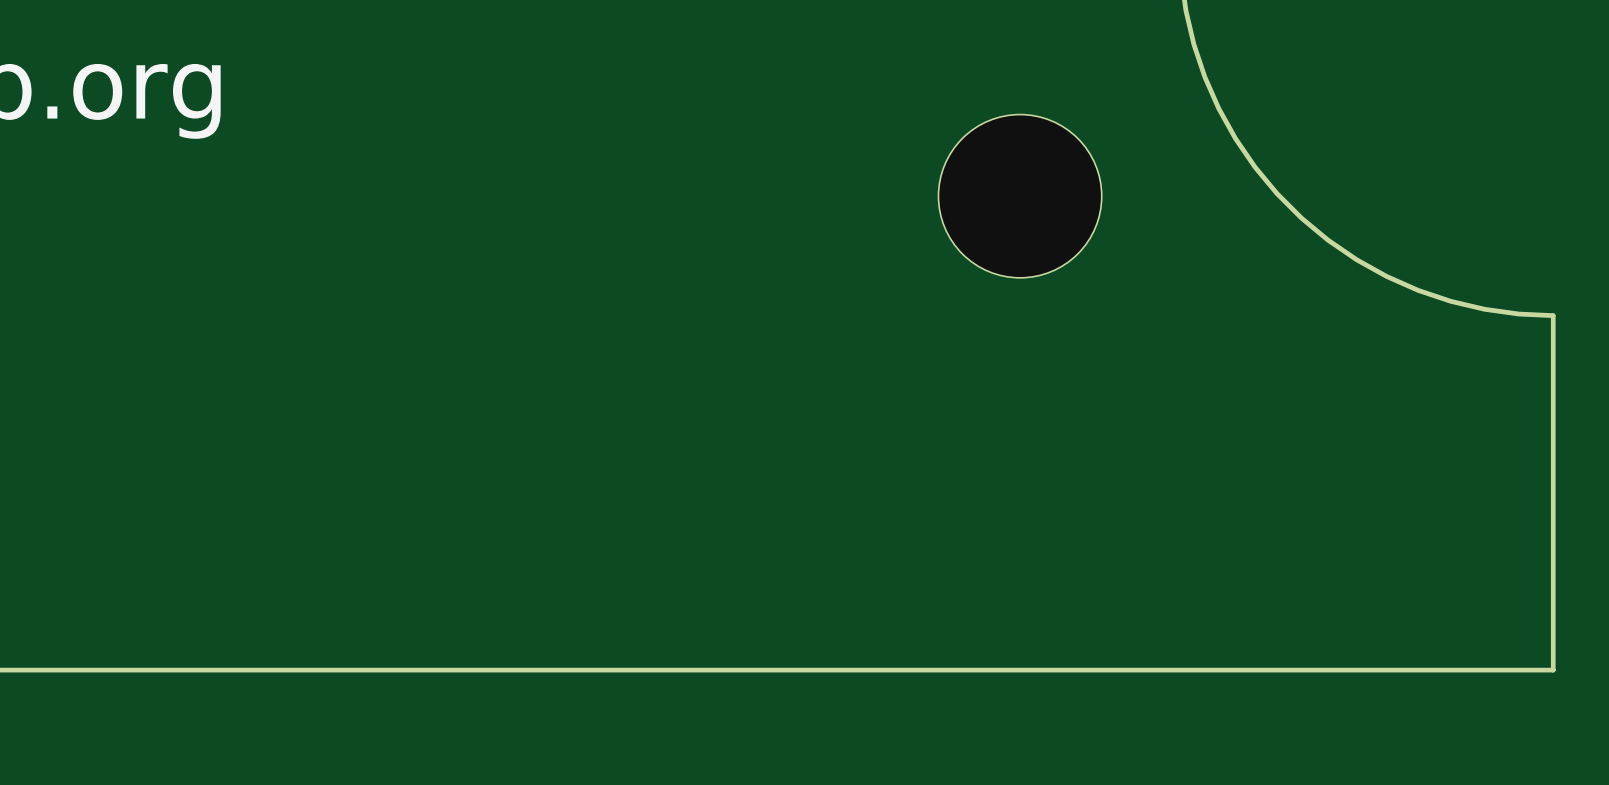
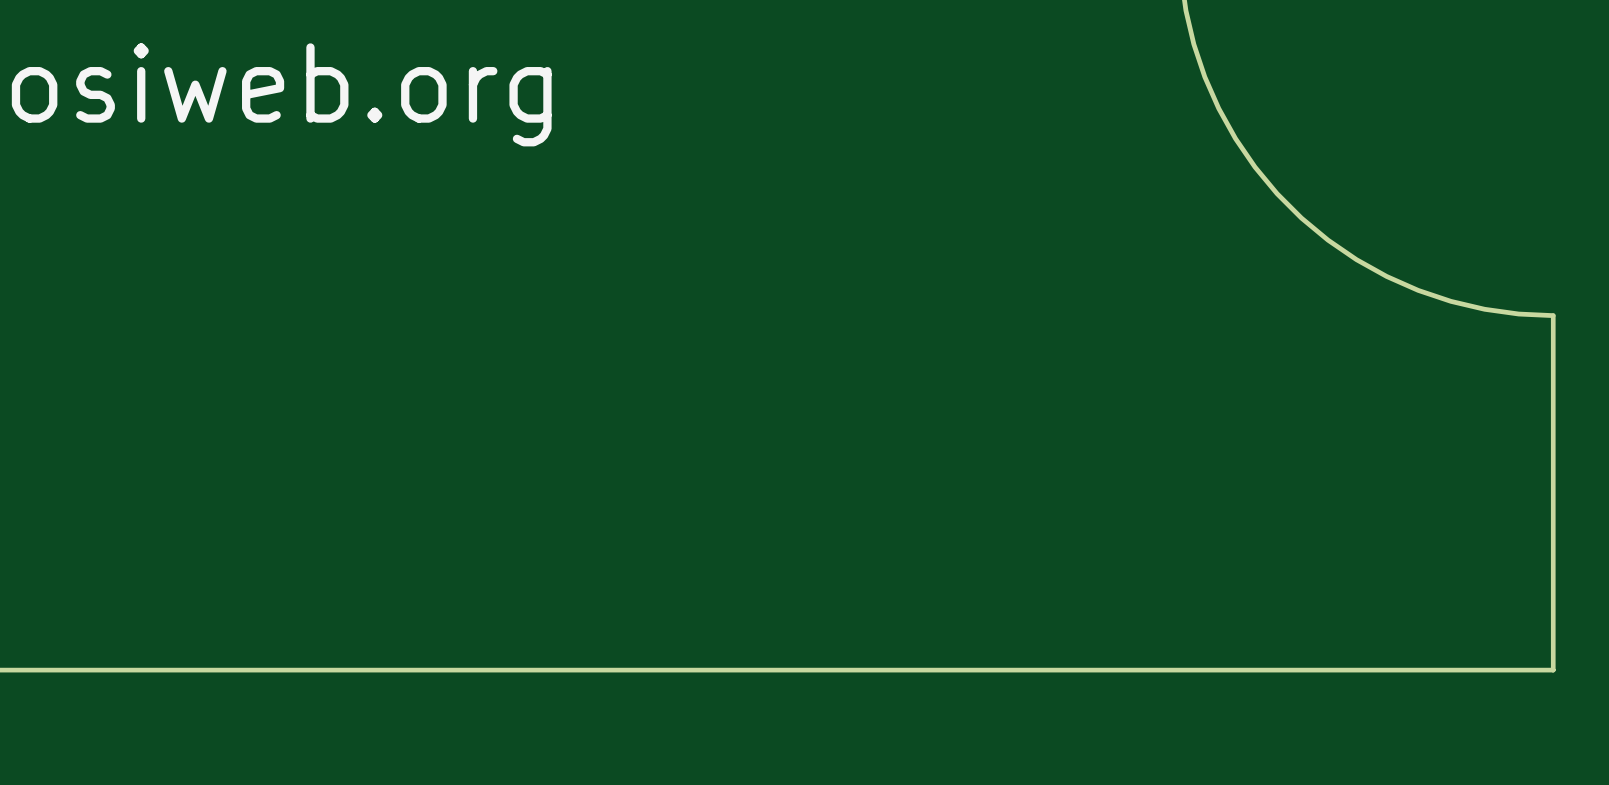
part: (1020, 196) -> none

